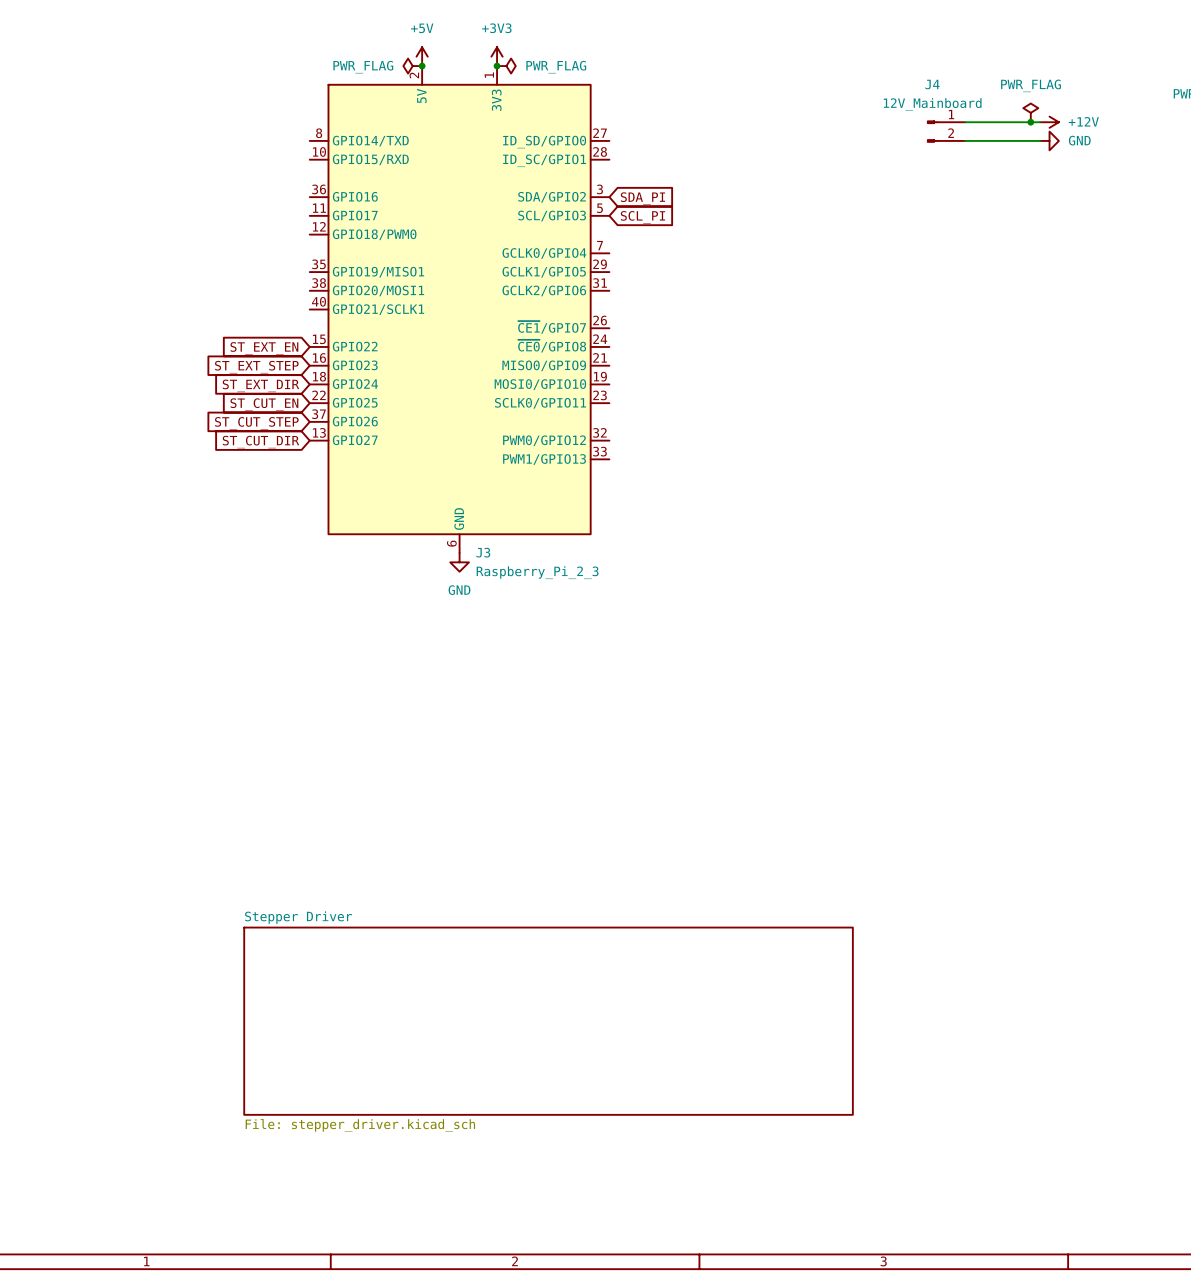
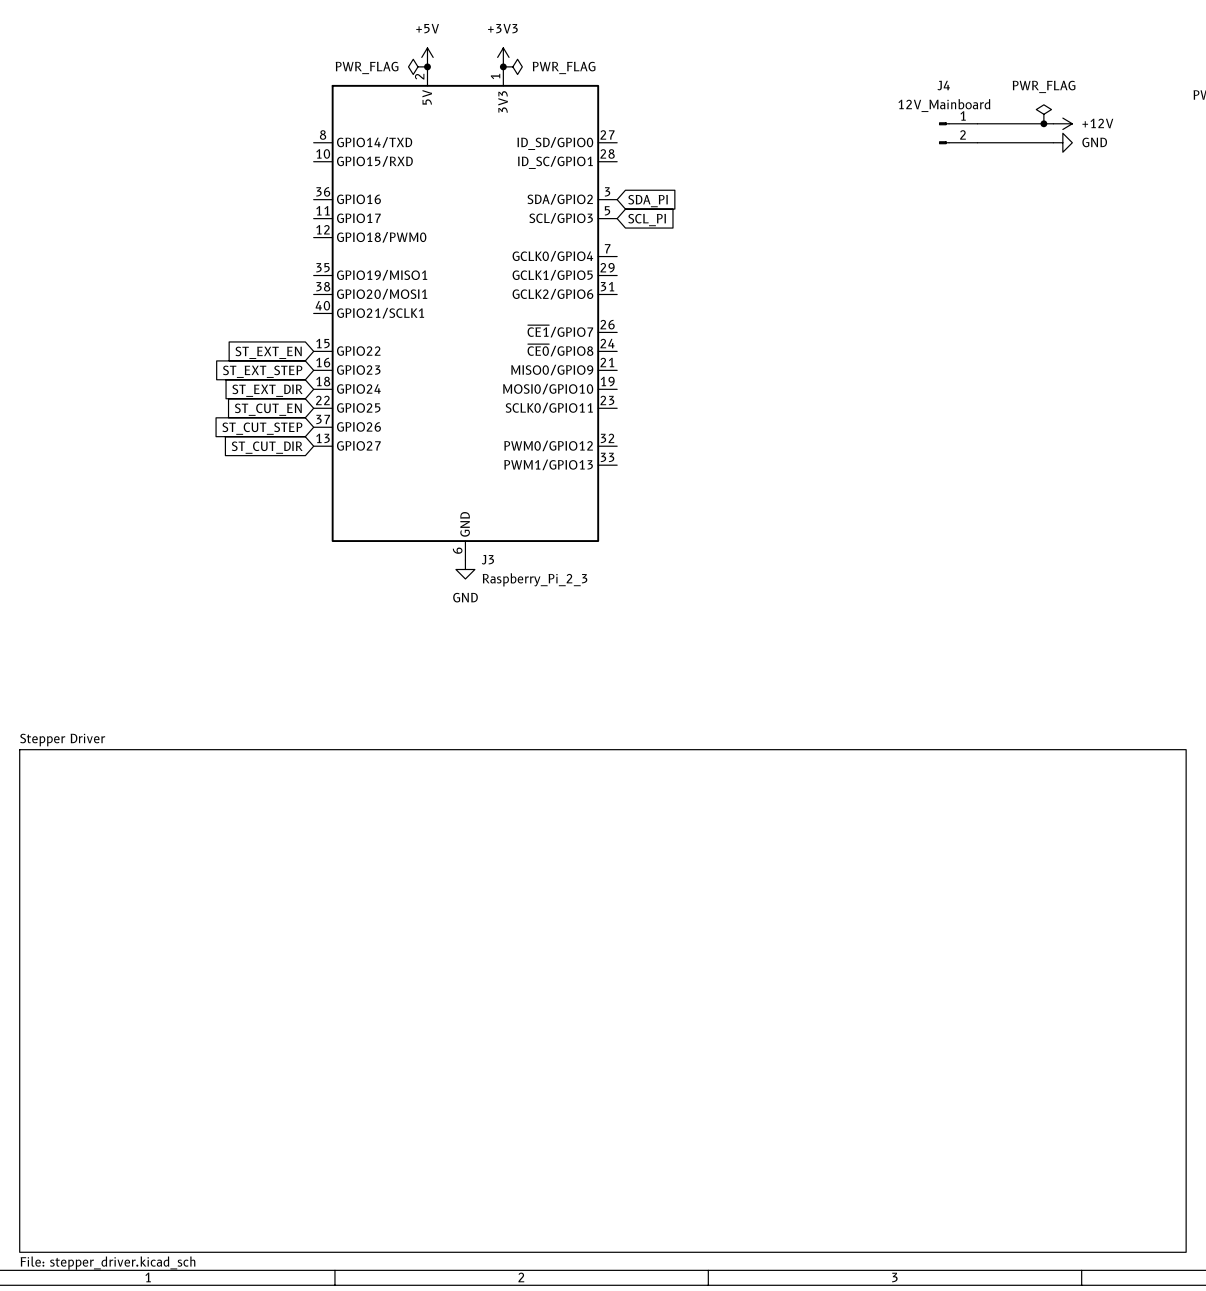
sheet Stepper Driver: none -> File: stepper_driver.kicad_sch (602, 1000)
sheet Stepper Driver: File: stepper_driver.kicad_sch (548, 1021) -> none

